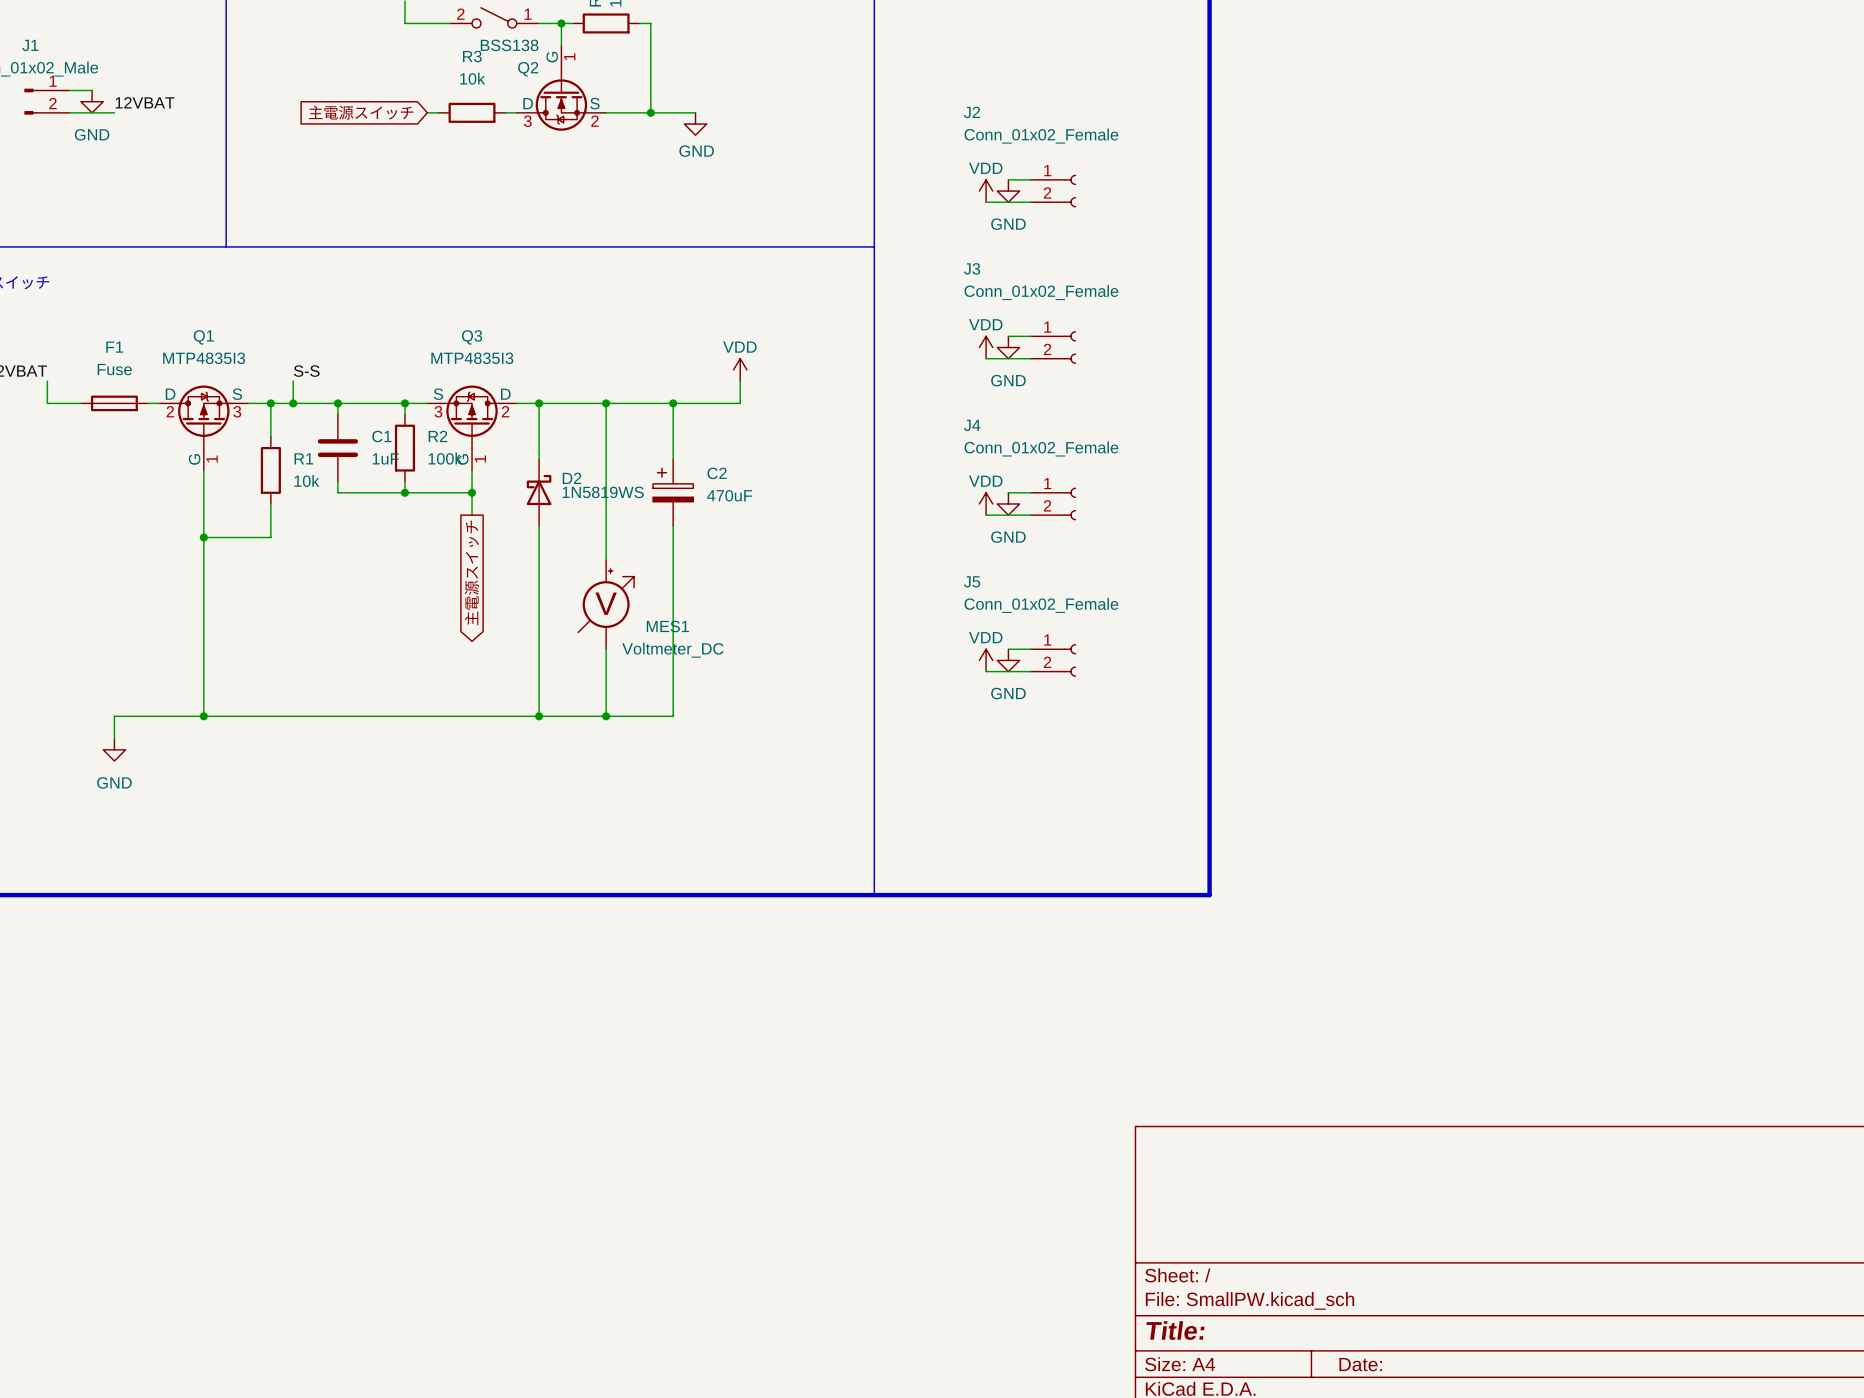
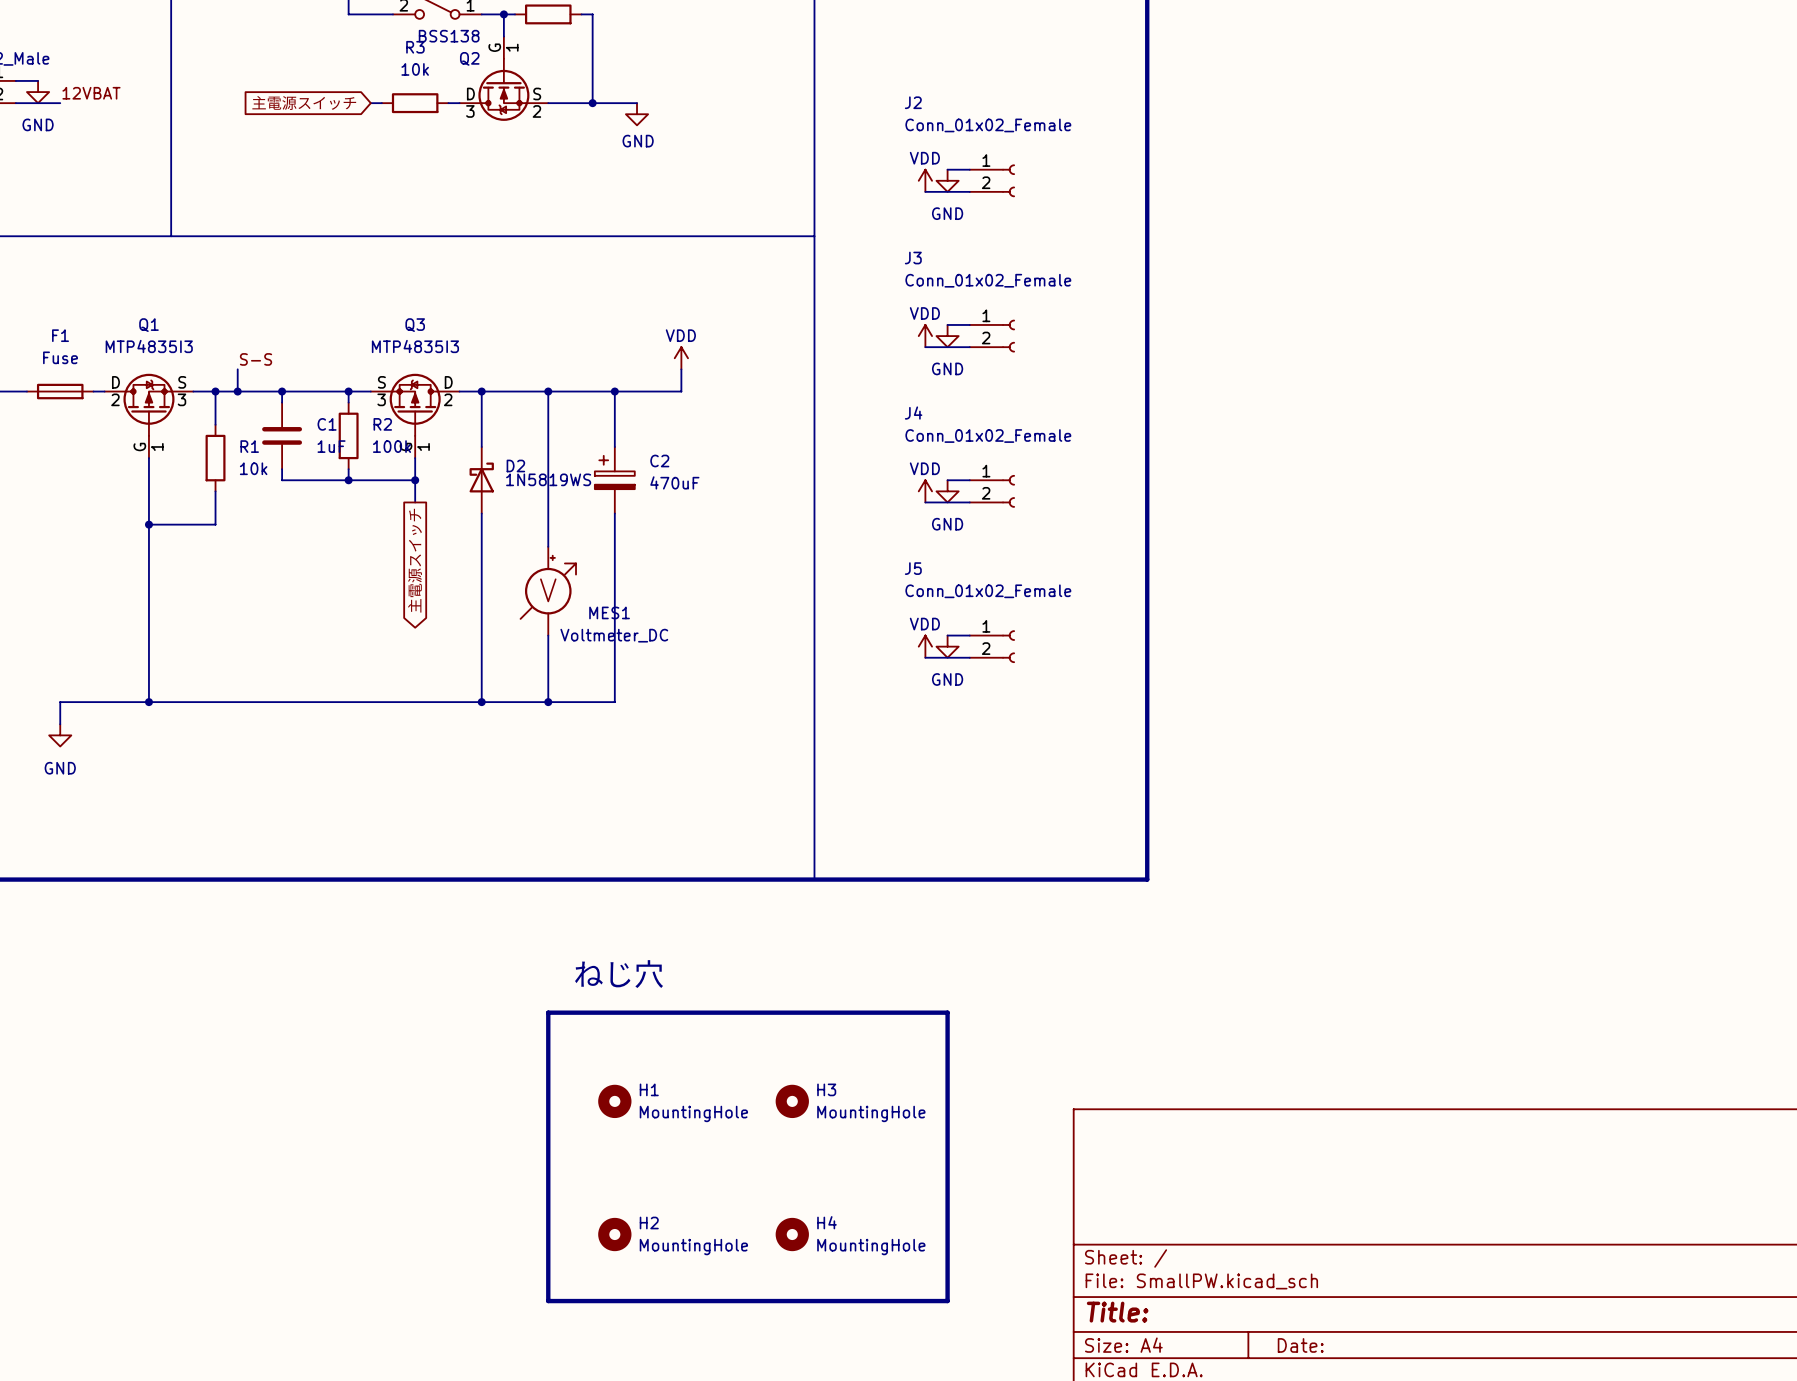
text: none -> ねじ穴 (619, 974)
line: none -> (548, 1012) (548, 1301) (947, 1301) (947, 1012) (548, 1012)
H1: none -> MountingHole (614, 1101)
H3: none -> MountingHole (792, 1101)
H2: none -> MountingHole (614, 1234)
H4: none -> MountingHole (792, 1234)

